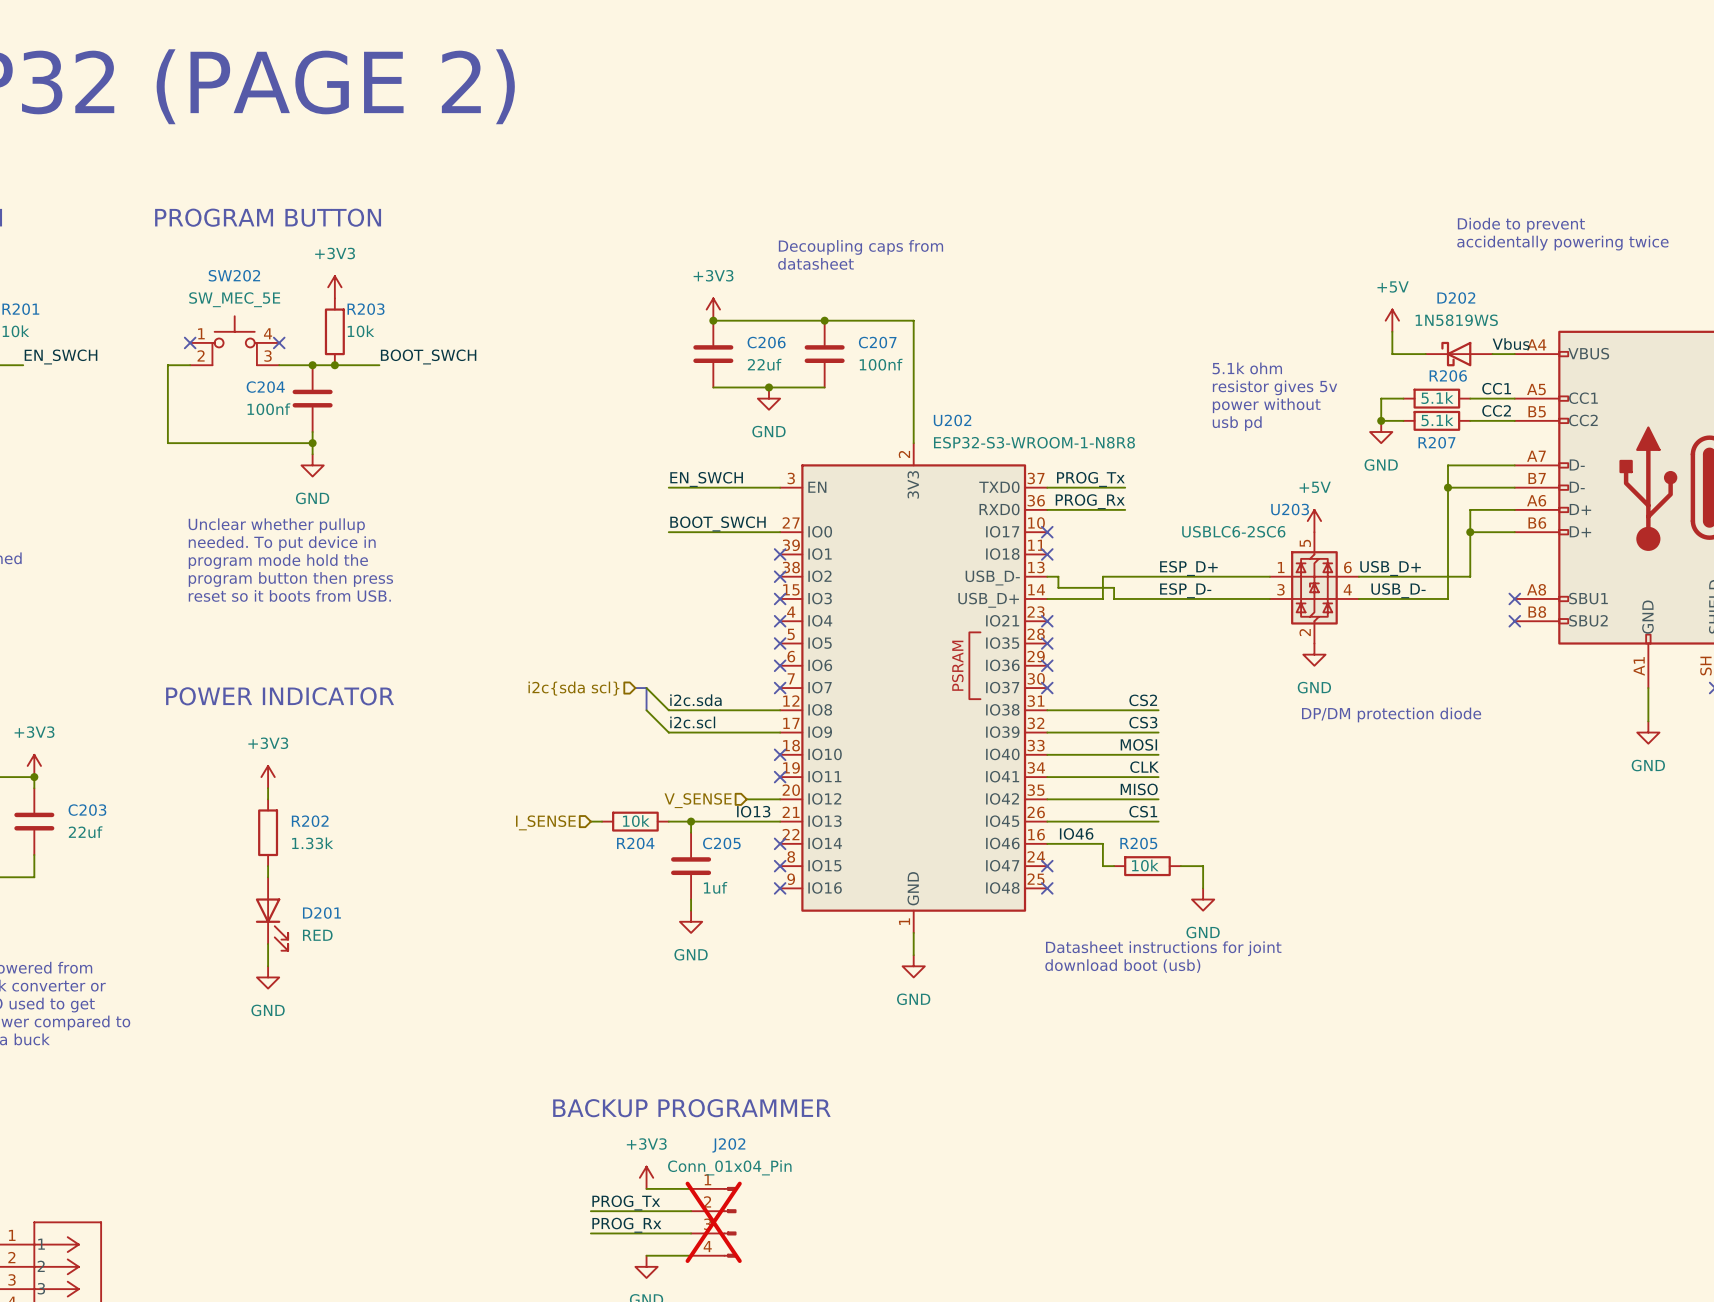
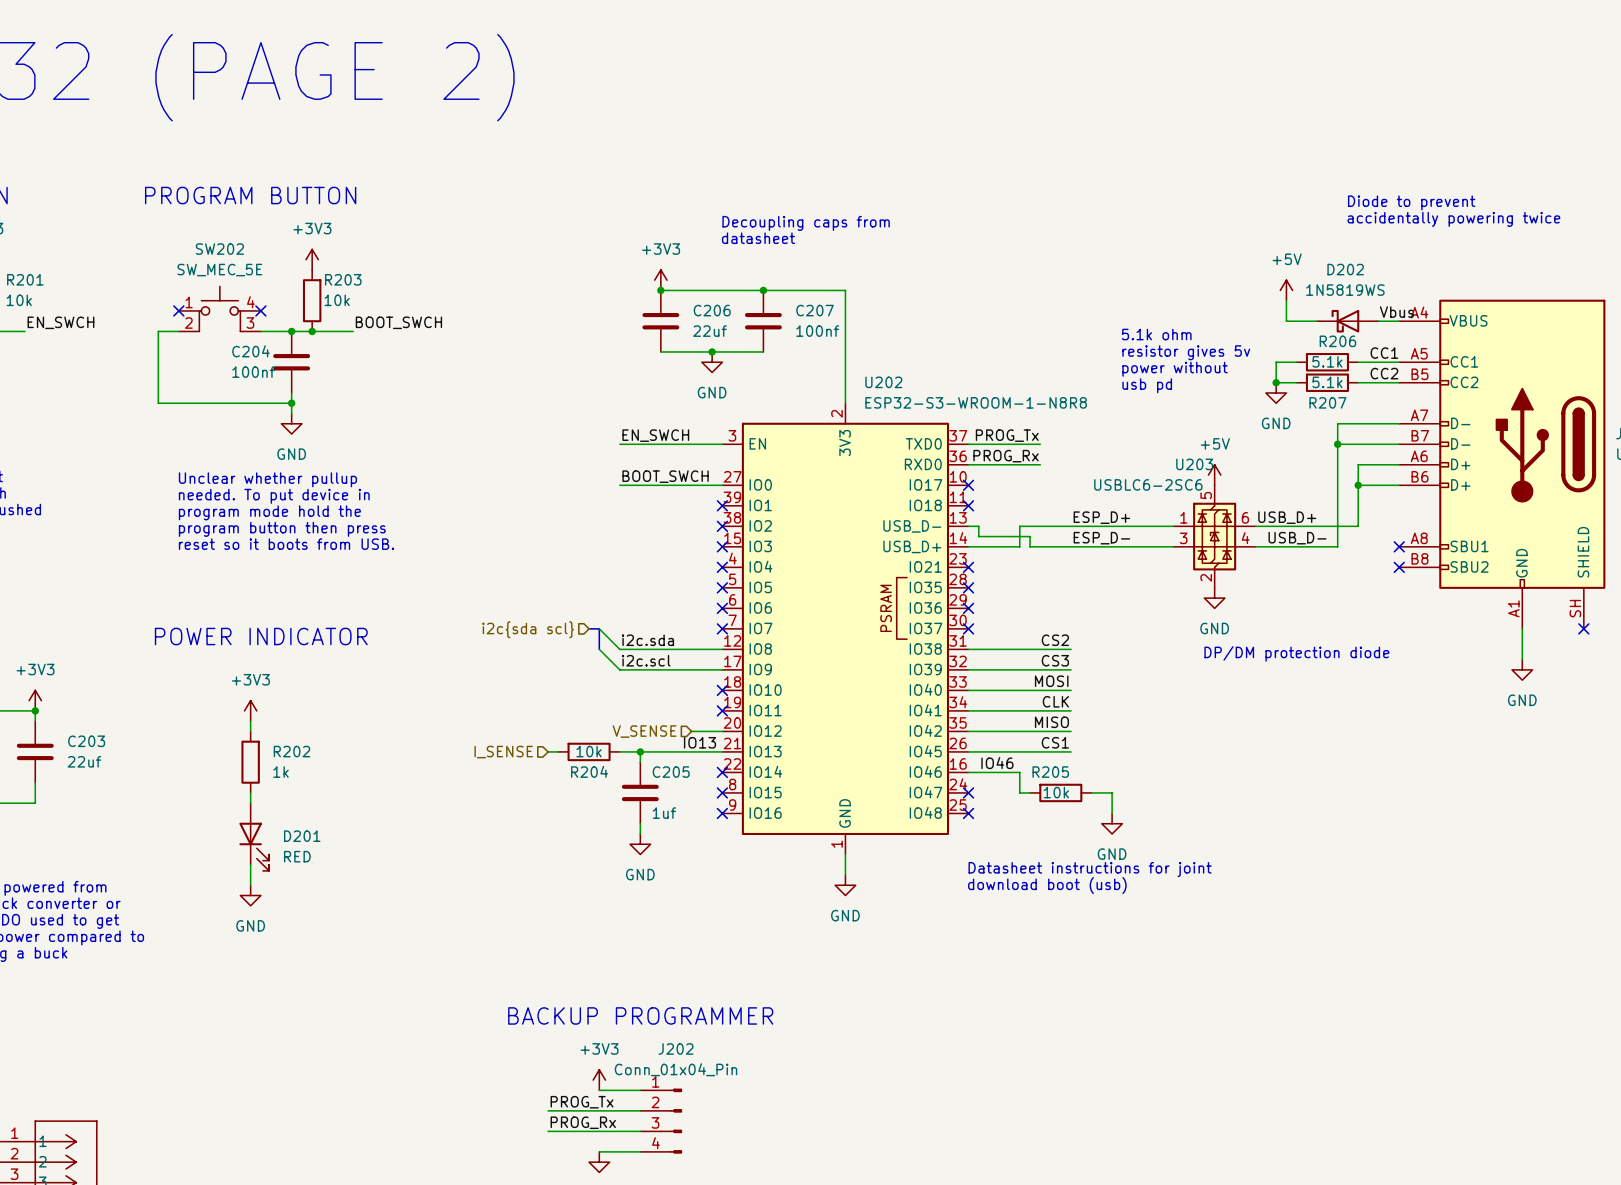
R202 value: 1.33k (312, 843) -> 1k (280, 772)
J202 do-not-place cross: (713, 1222) -> none

